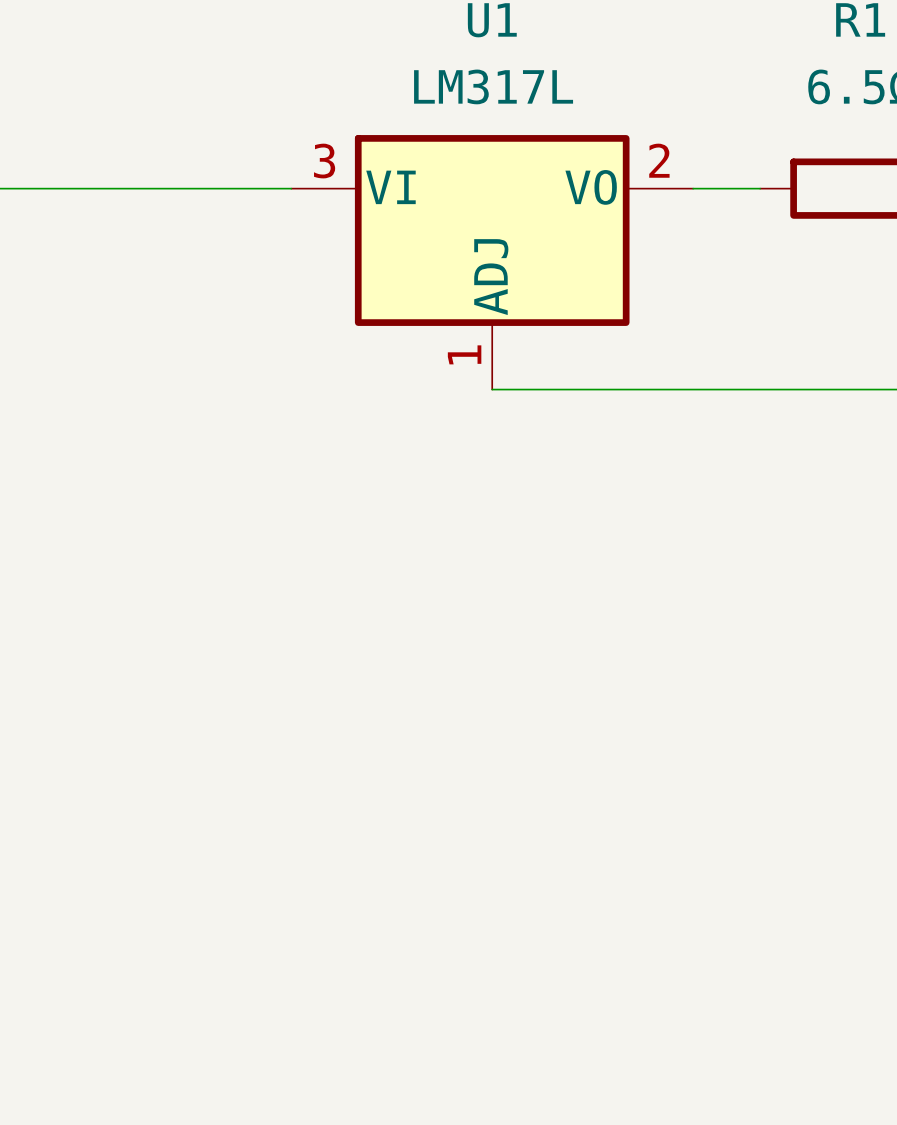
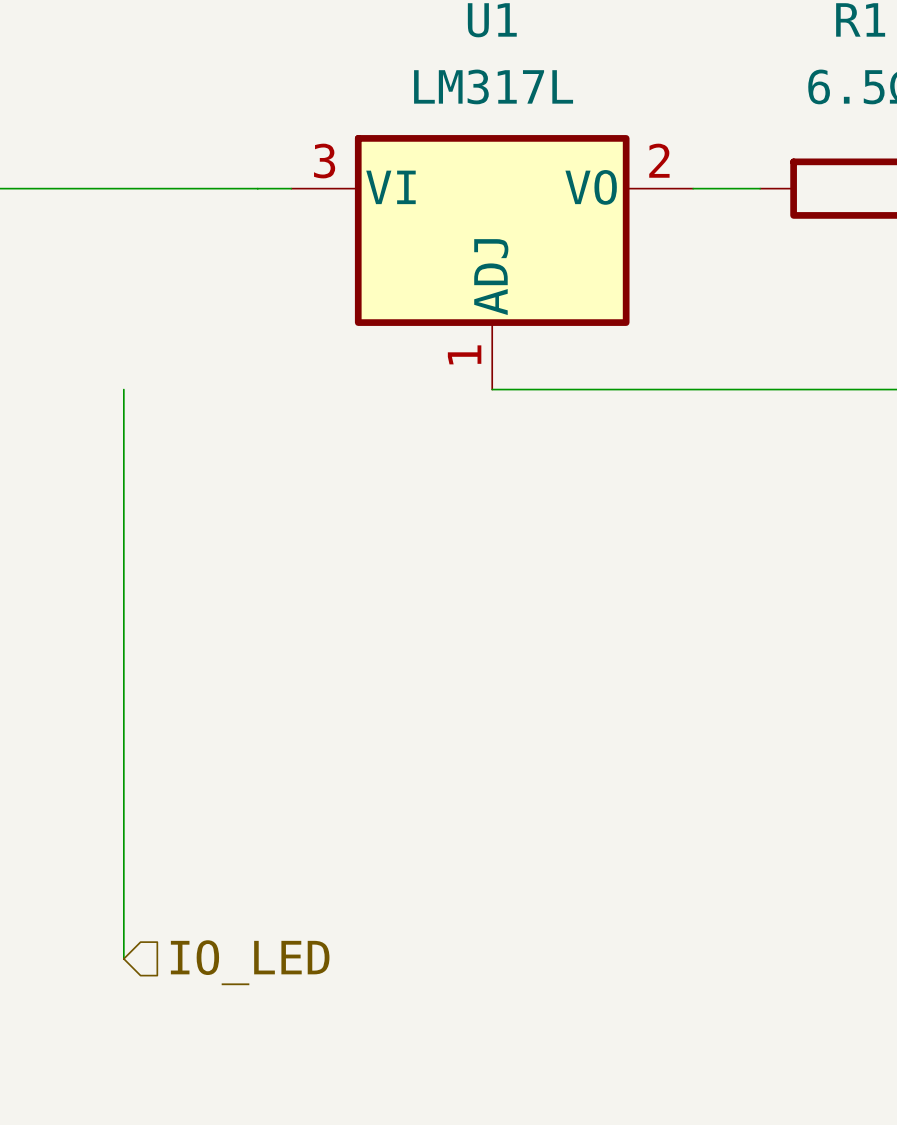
wire: none -> (123, 389) (123, 958)
hierarchical label: none -> IO_LED (250, 962)

